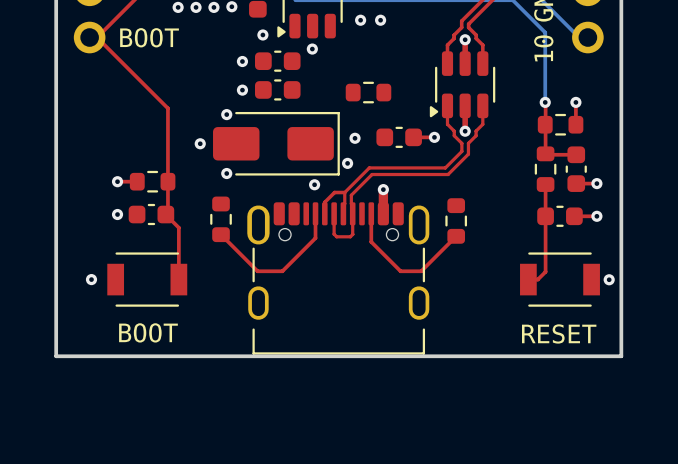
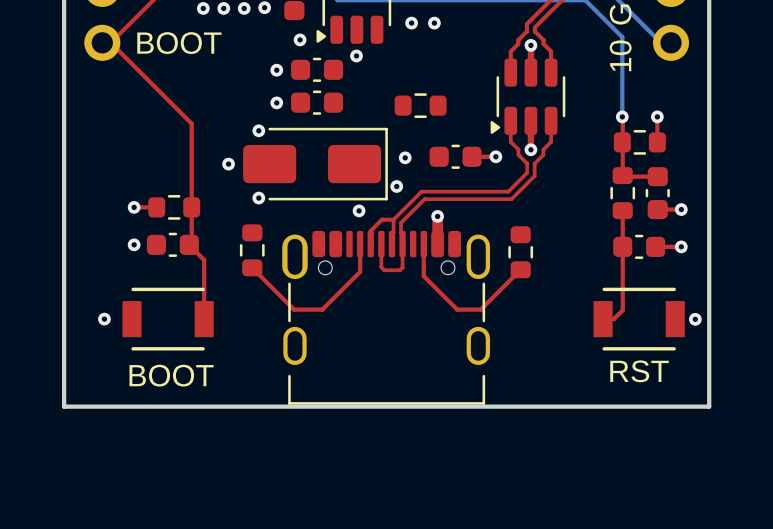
BOOT: (147, 279) -> none
part: none -> (168, 319)
RESET: (559, 279) -> none
part: none -> (639, 319)
text: none -> RST (639, 371)
text: none -> BOOT (171, 375)

